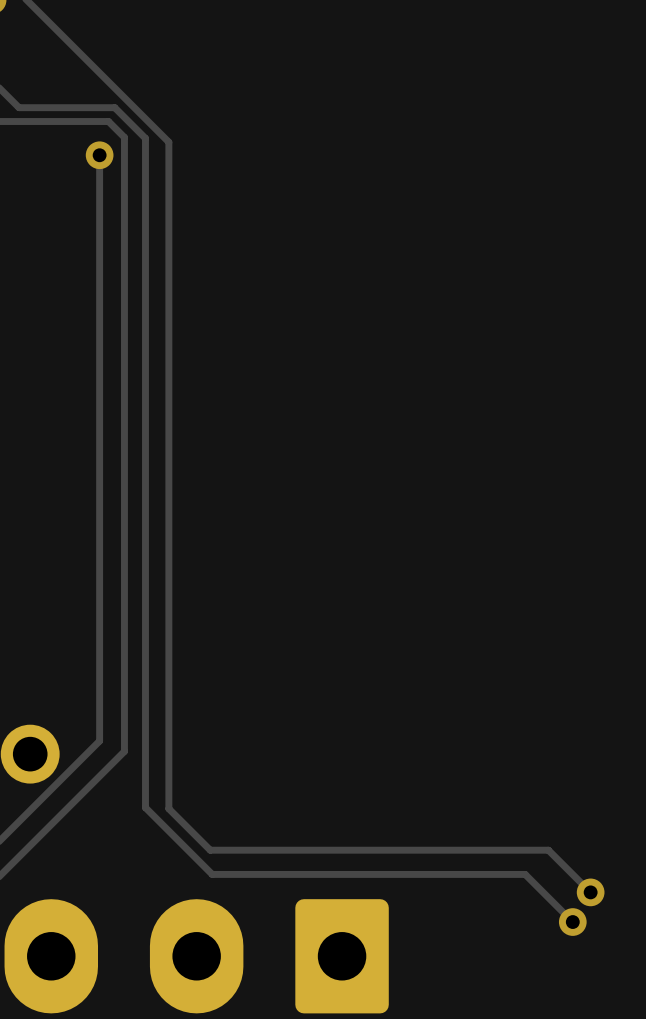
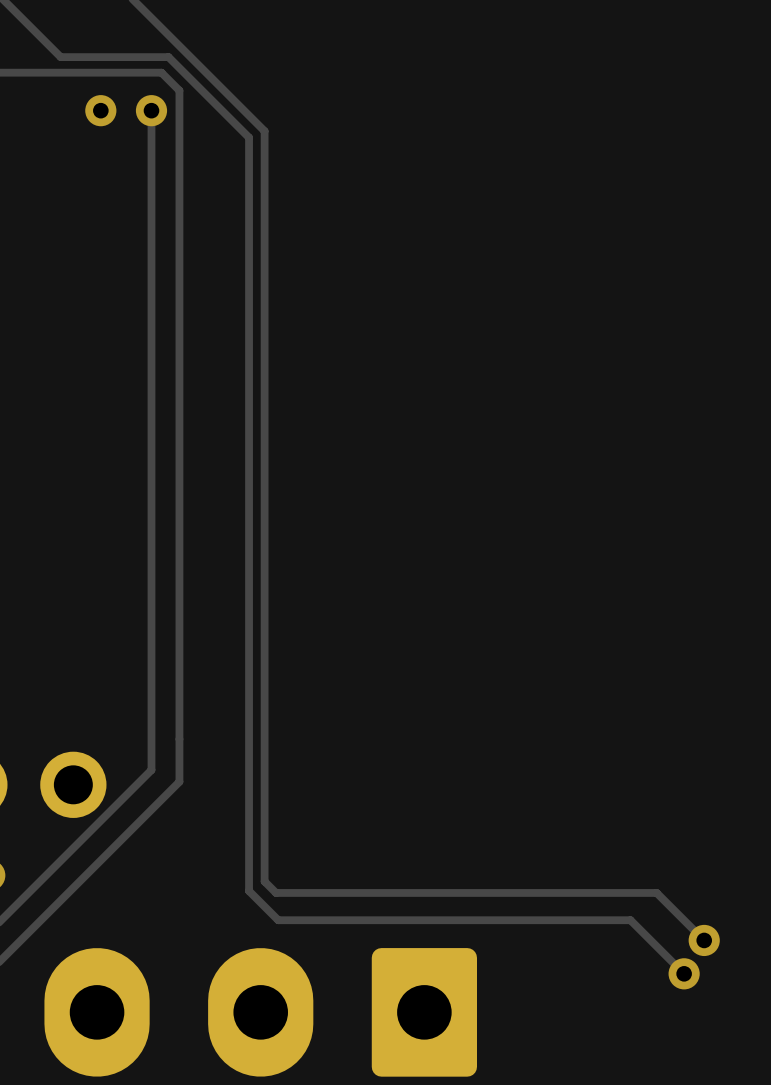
track: (145, 138) (145, 807) (186, 848) -> (203, 91) (249, 137) (249, 891)
track: (168, 142) (168, 808) (200, 840) -> (229, 95) (264, 131) (264, 881)
via: none -> (100, 110)

